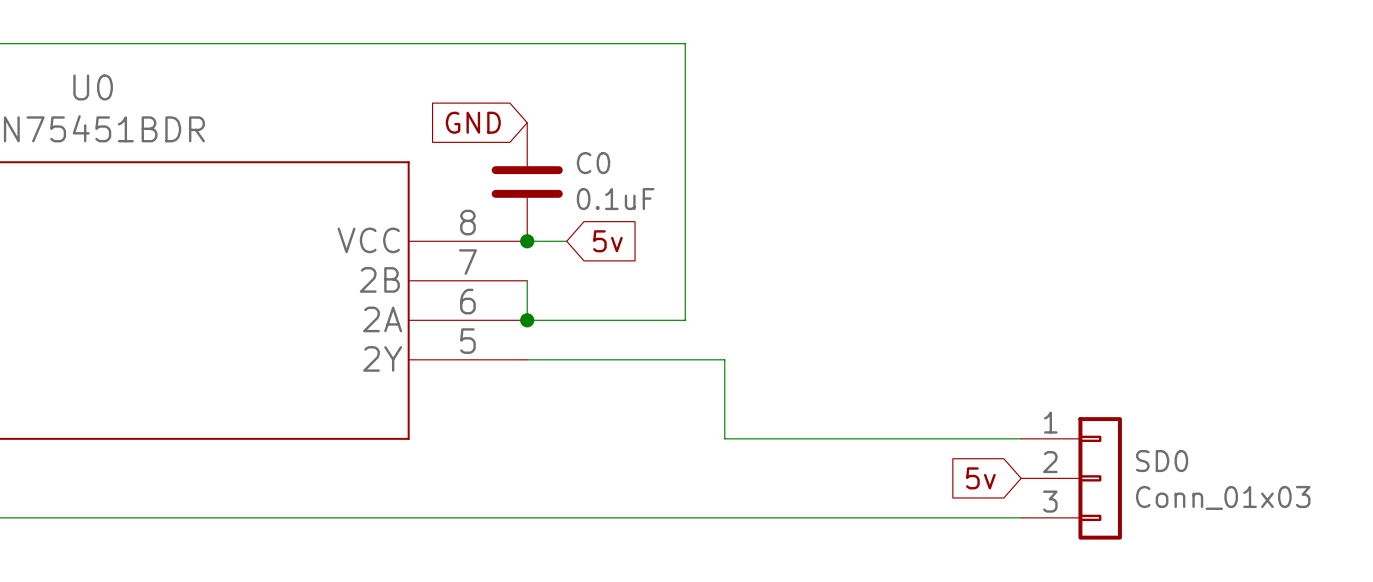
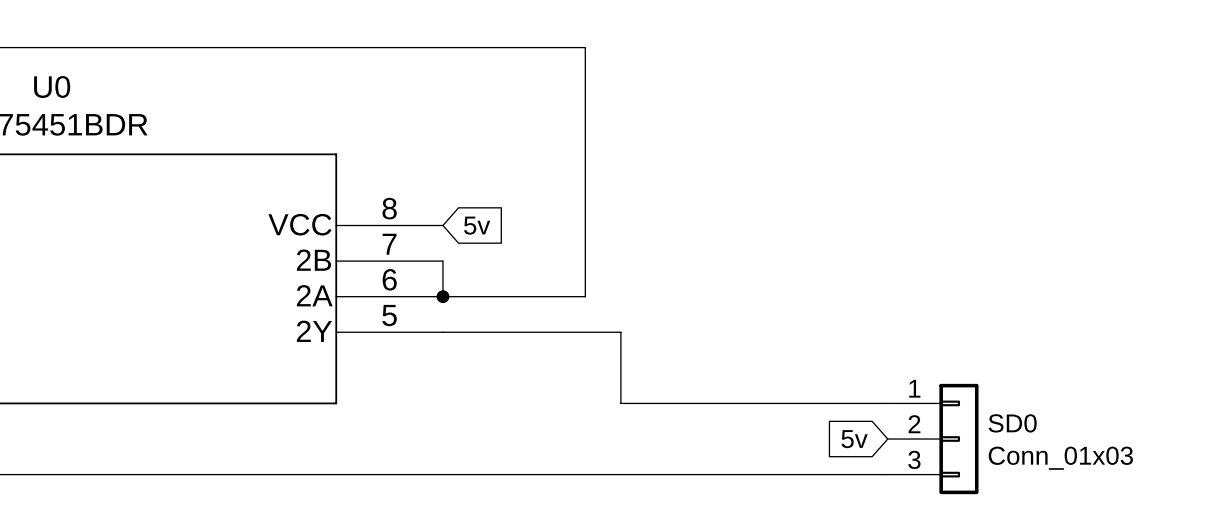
global label: GND (473, 122) -> none
C0: 0.1uF (527, 182) -> none
wire: (527, 241) (566, 241) -> none
junction: (527, 241) -> none
global label position: 5v (607, 241) -> 5v (477, 225)

